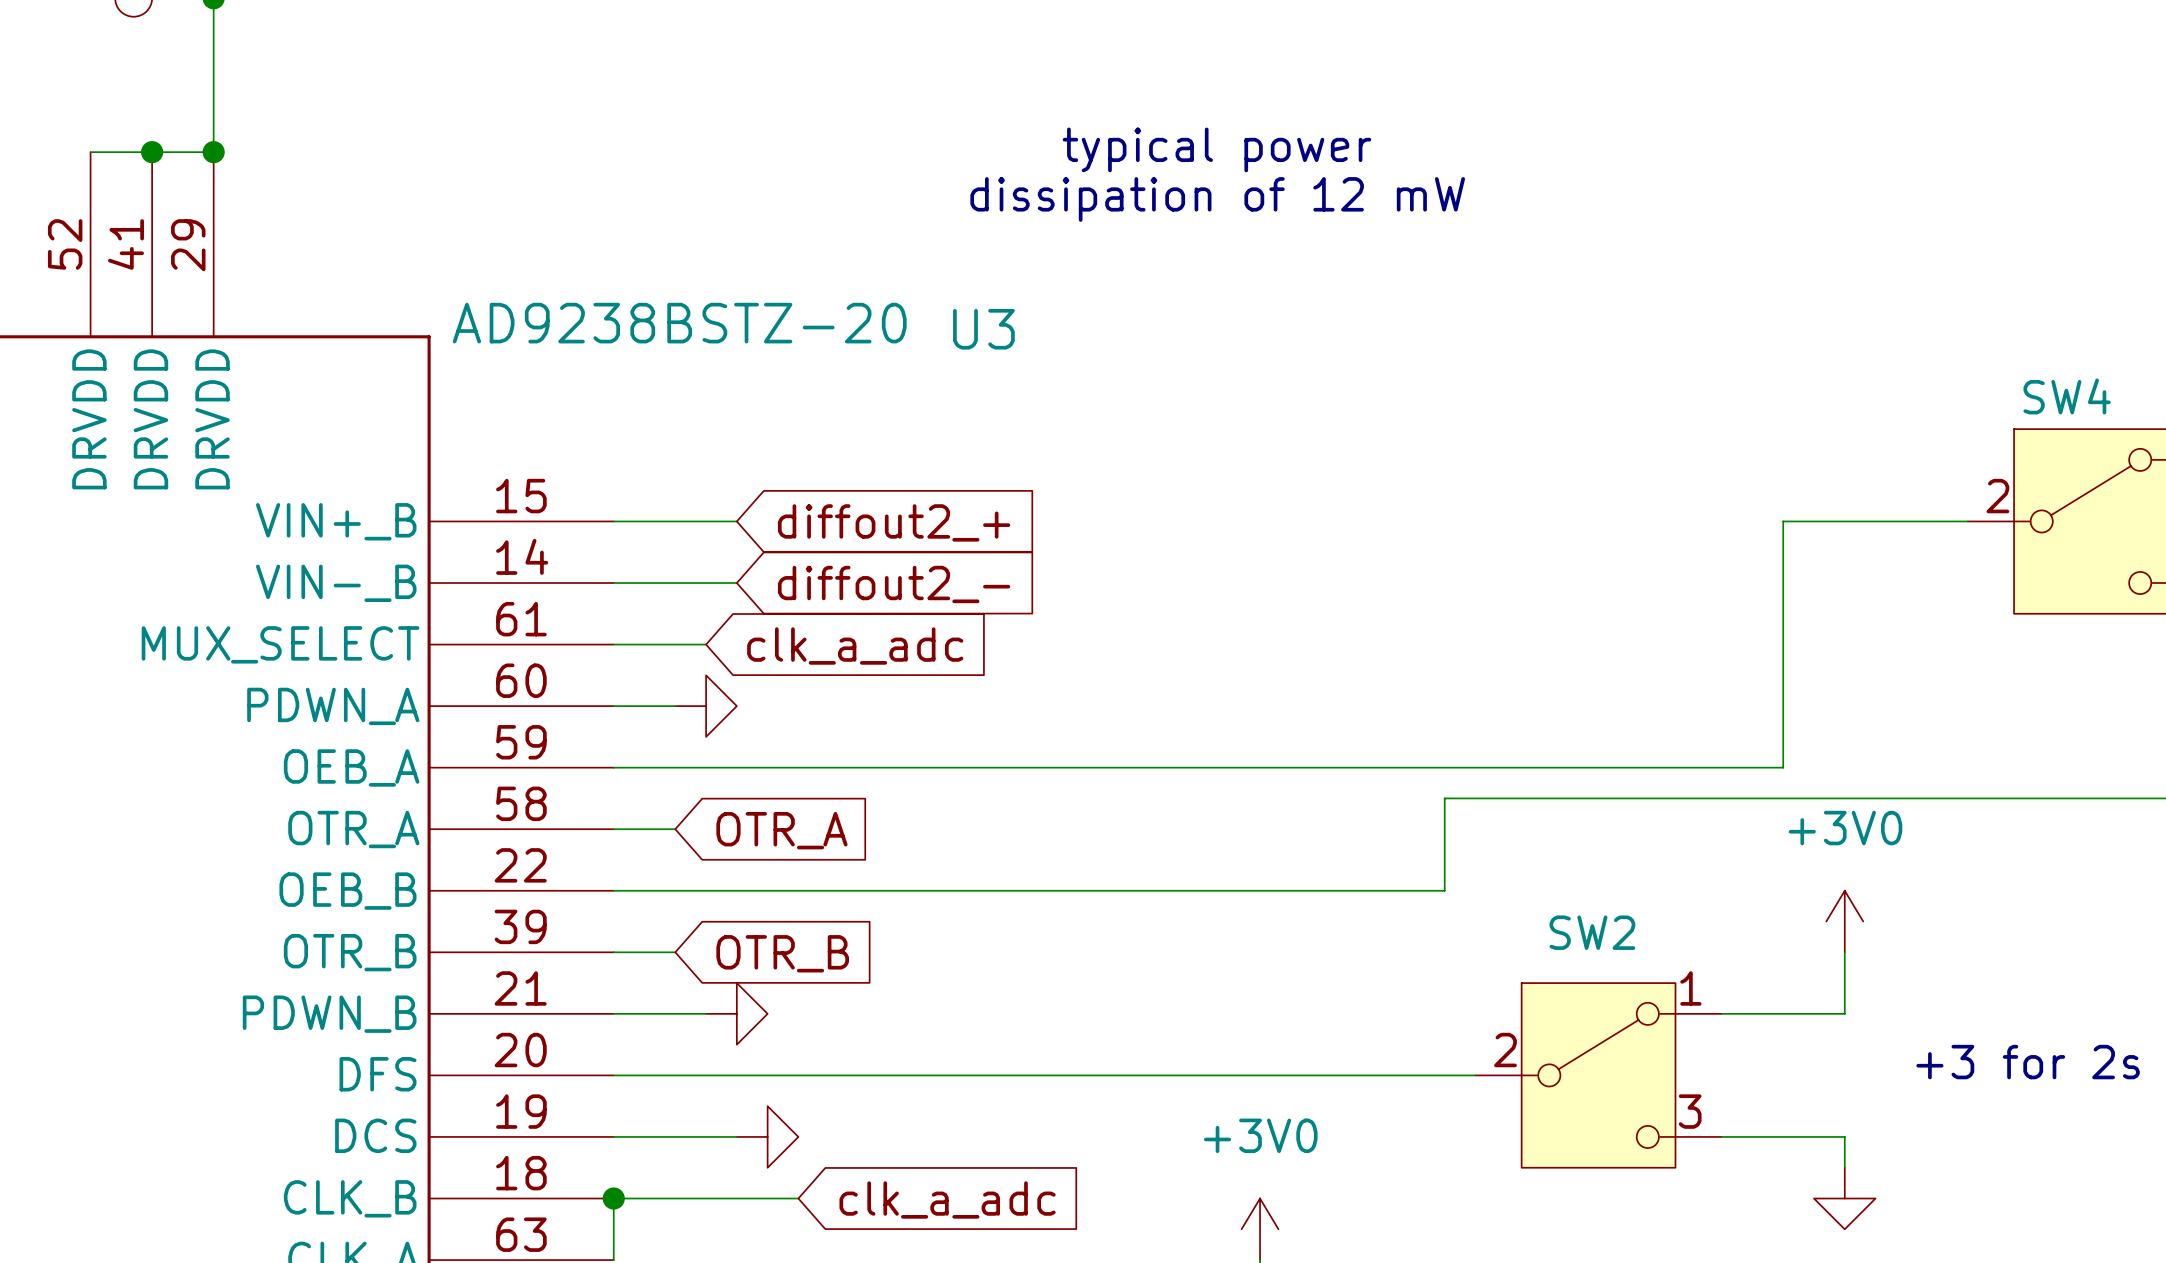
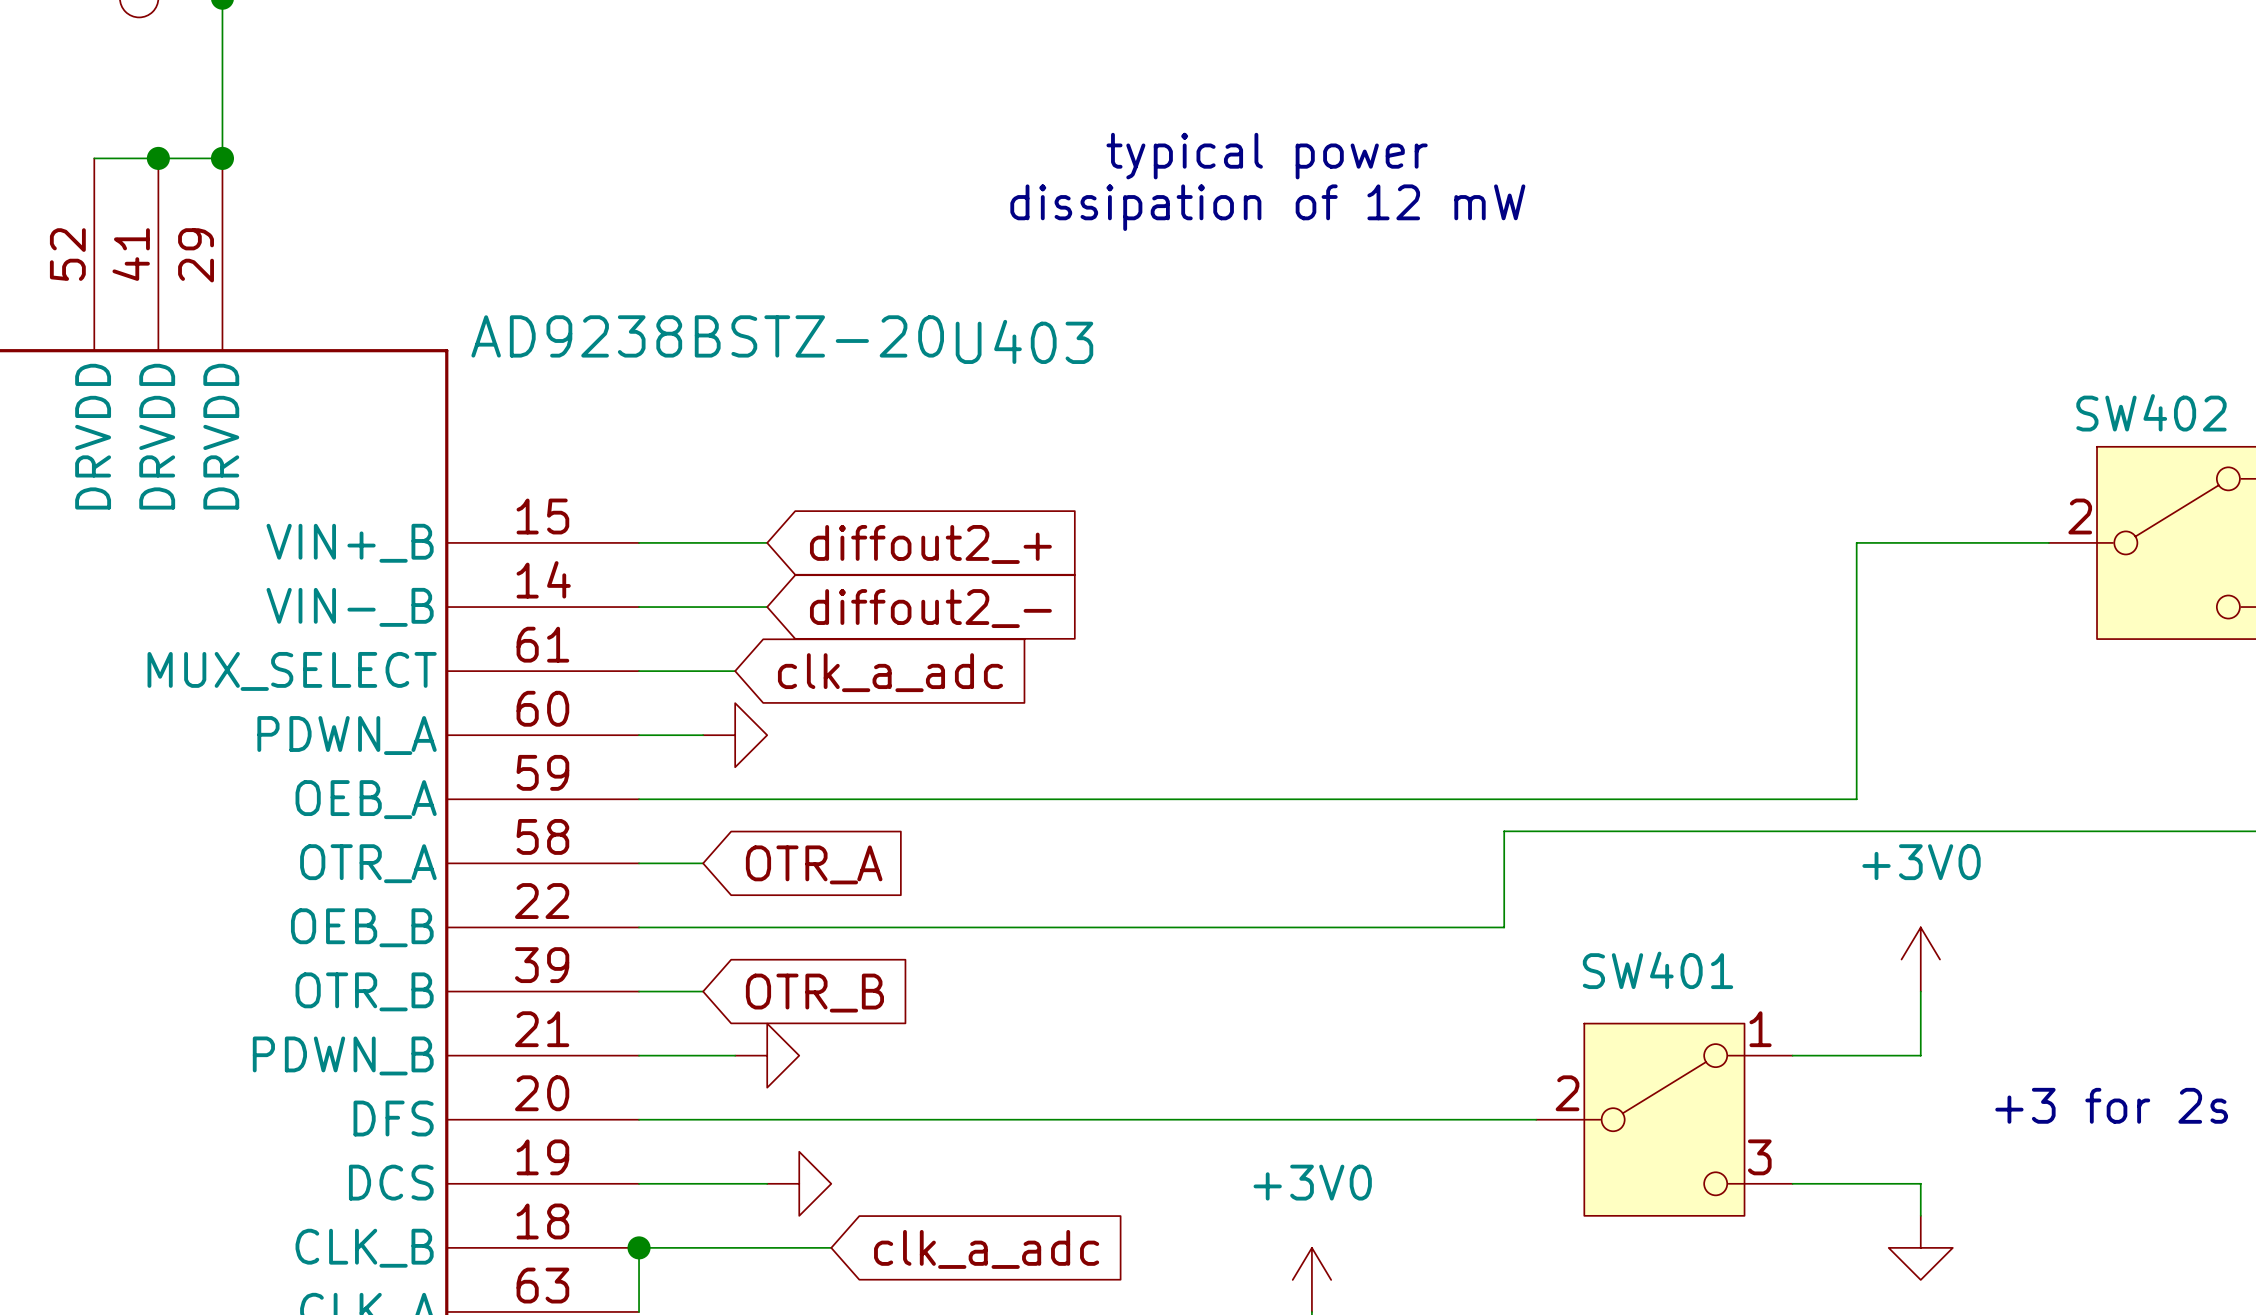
U3 name: U3 (983, 329) -> U403 (1024, 341)
SW4 name: SW4 (2067, 396) -> SW402 (2151, 412)
SW2 name: SW2 (1592, 932) -> SW401 (1658, 970)

